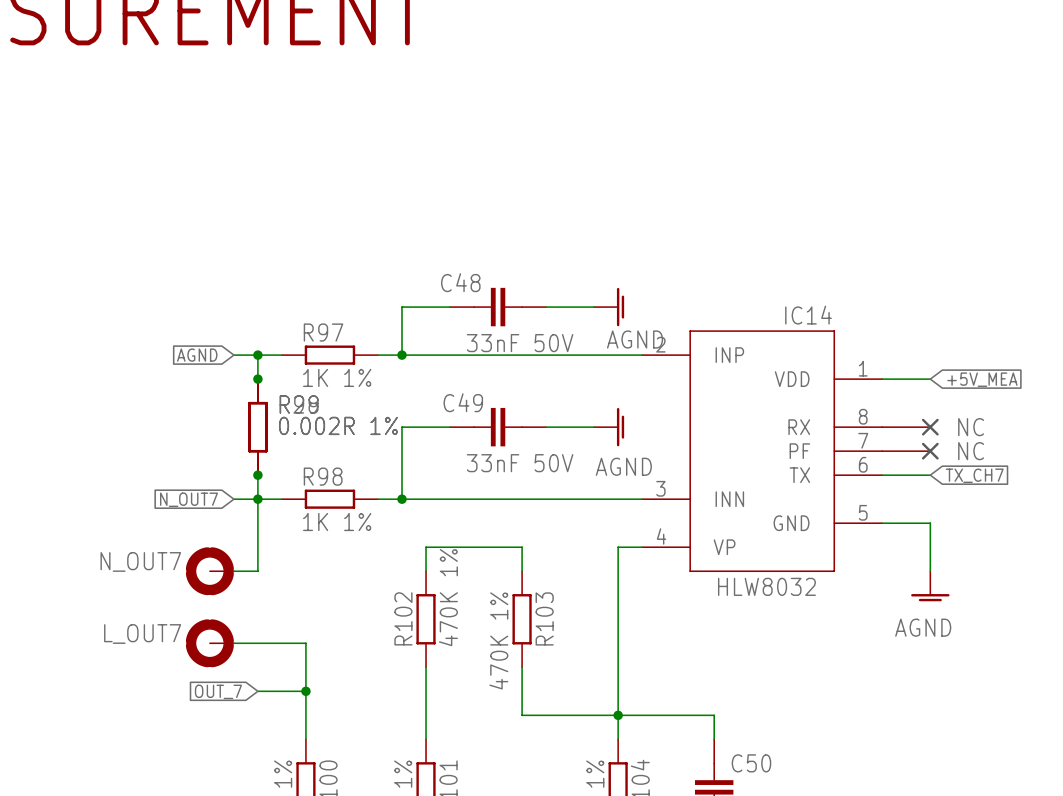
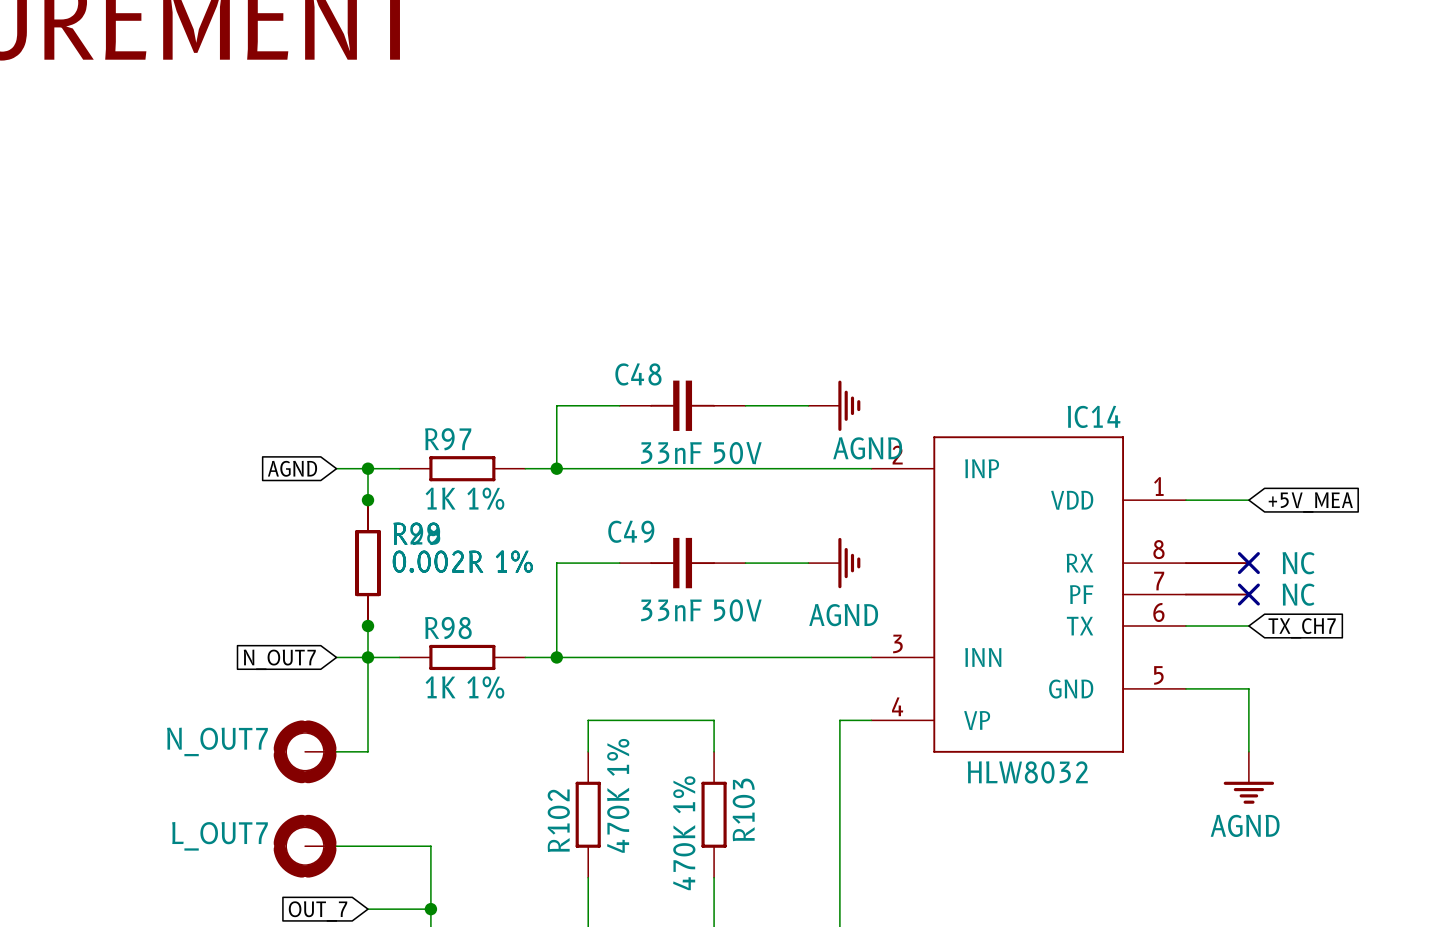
power symbol shape: [594, 287, 625, 327] -> [808, 380, 861, 431]
power symbol shape: [594, 407, 625, 447] -> [808, 537, 861, 589]
power symbol shape: [911, 571, 950, 602] -> [1223, 751, 1275, 804]

